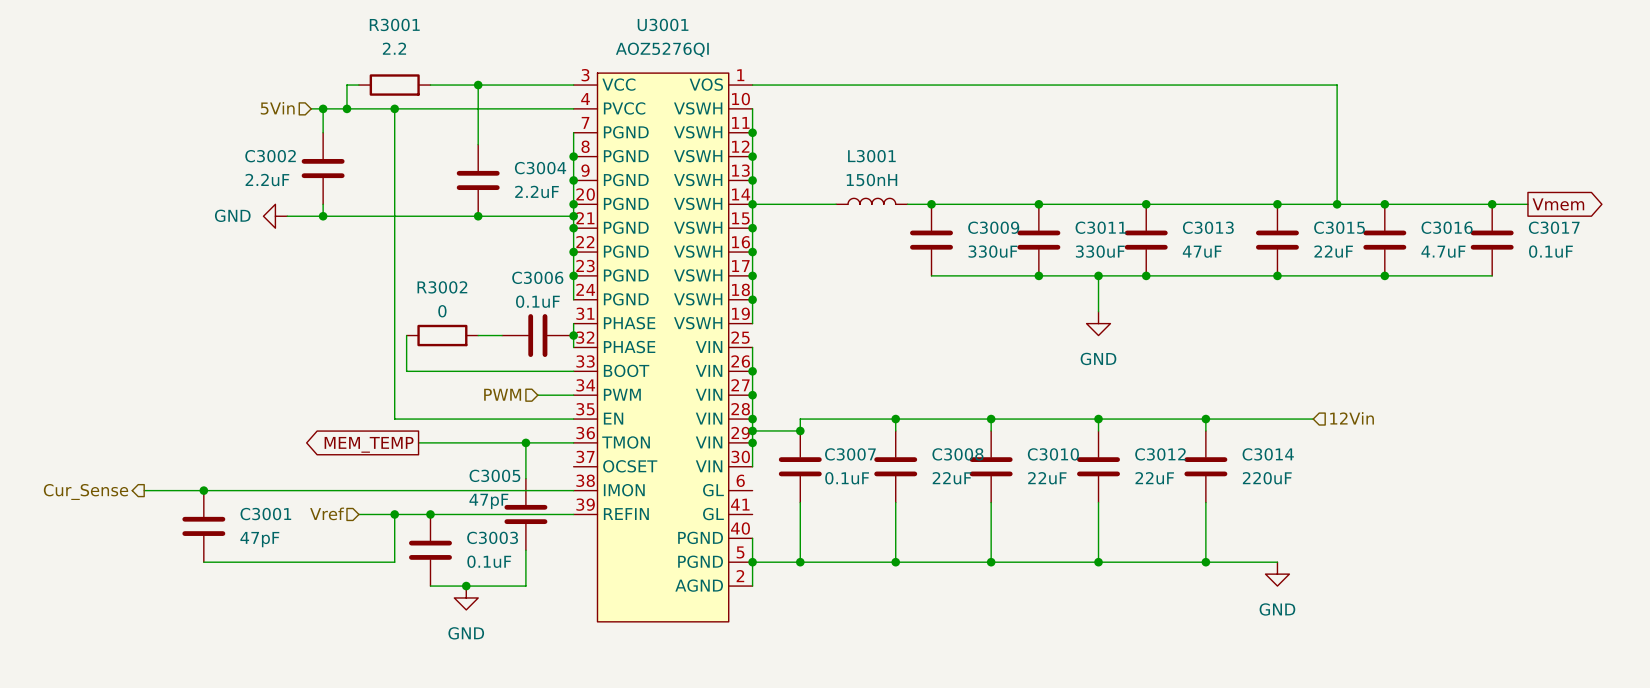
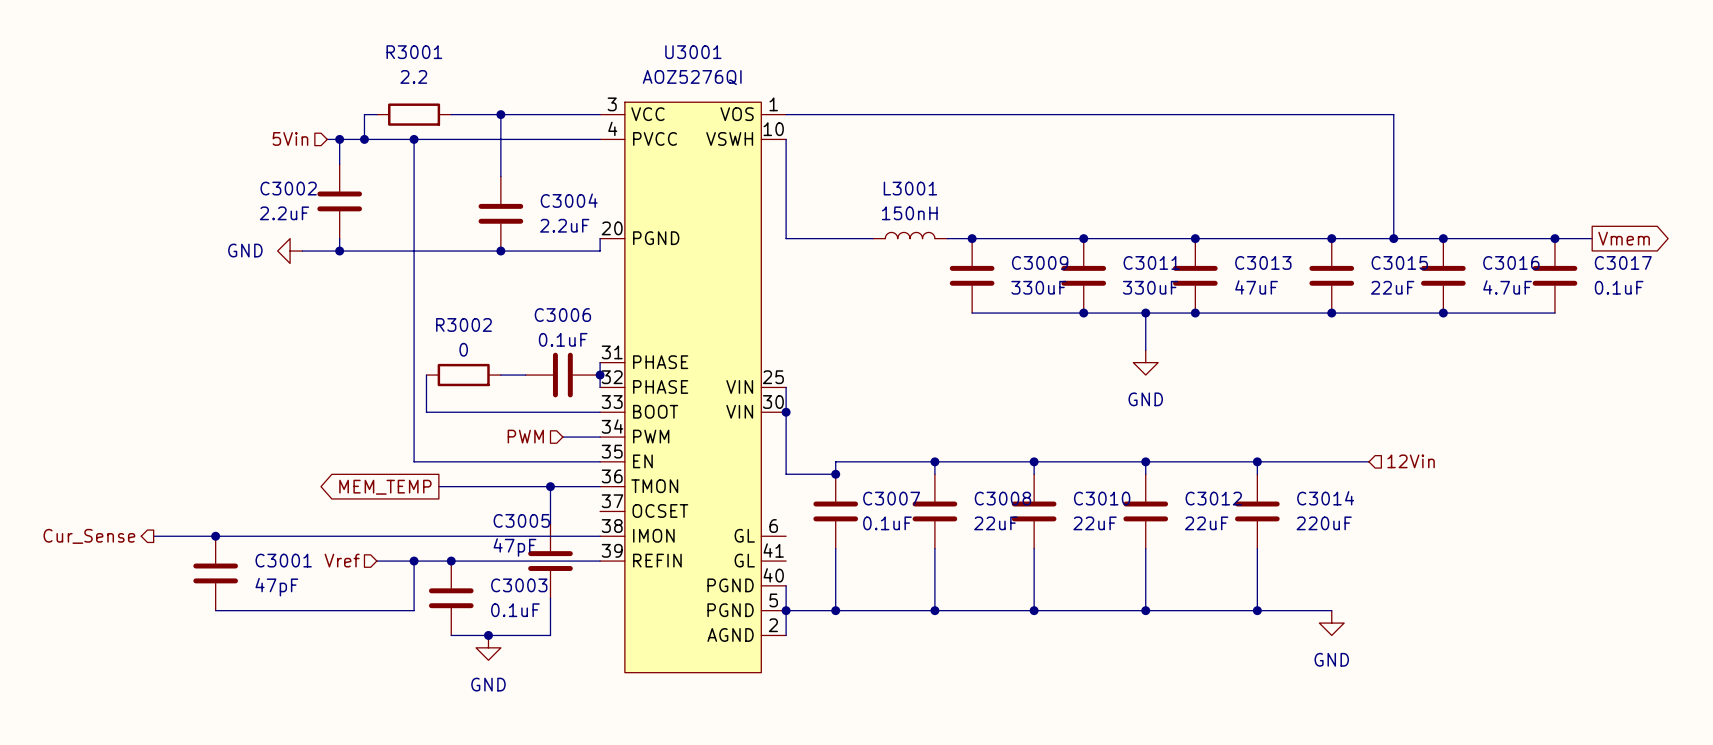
U3001 symbol: [573, 73, 753, 622] -> [600, 102, 787, 673]
wire: (573, 132) (573, 204) -> none
junction: (752, 132) -> none
junction: (573, 156) -> none
junction: (752, 156) -> none
junction: (573, 180) -> none
junction: (752, 180) -> none
junction: (573, 204) -> none
wire: (752, 204) (752, 323) -> none
junction: (752, 204) -> none
wire: (573, 216) (573, 299) -> none
junction: (573, 216) -> none
junction: (573, 228) -> none
junction: (752, 228) -> none
junction: (573, 252) -> none
junction: (752, 252) -> none
junction: (573, 275) -> none
junction: (752, 275) -> none
junction: (752, 299) -> none
junction: (752, 395) -> none
junction: (752, 419) -> none
wire: (752, 430) (752, 466) -> none
junction: (752, 430) -> none
junction: (752, 442) -> none

